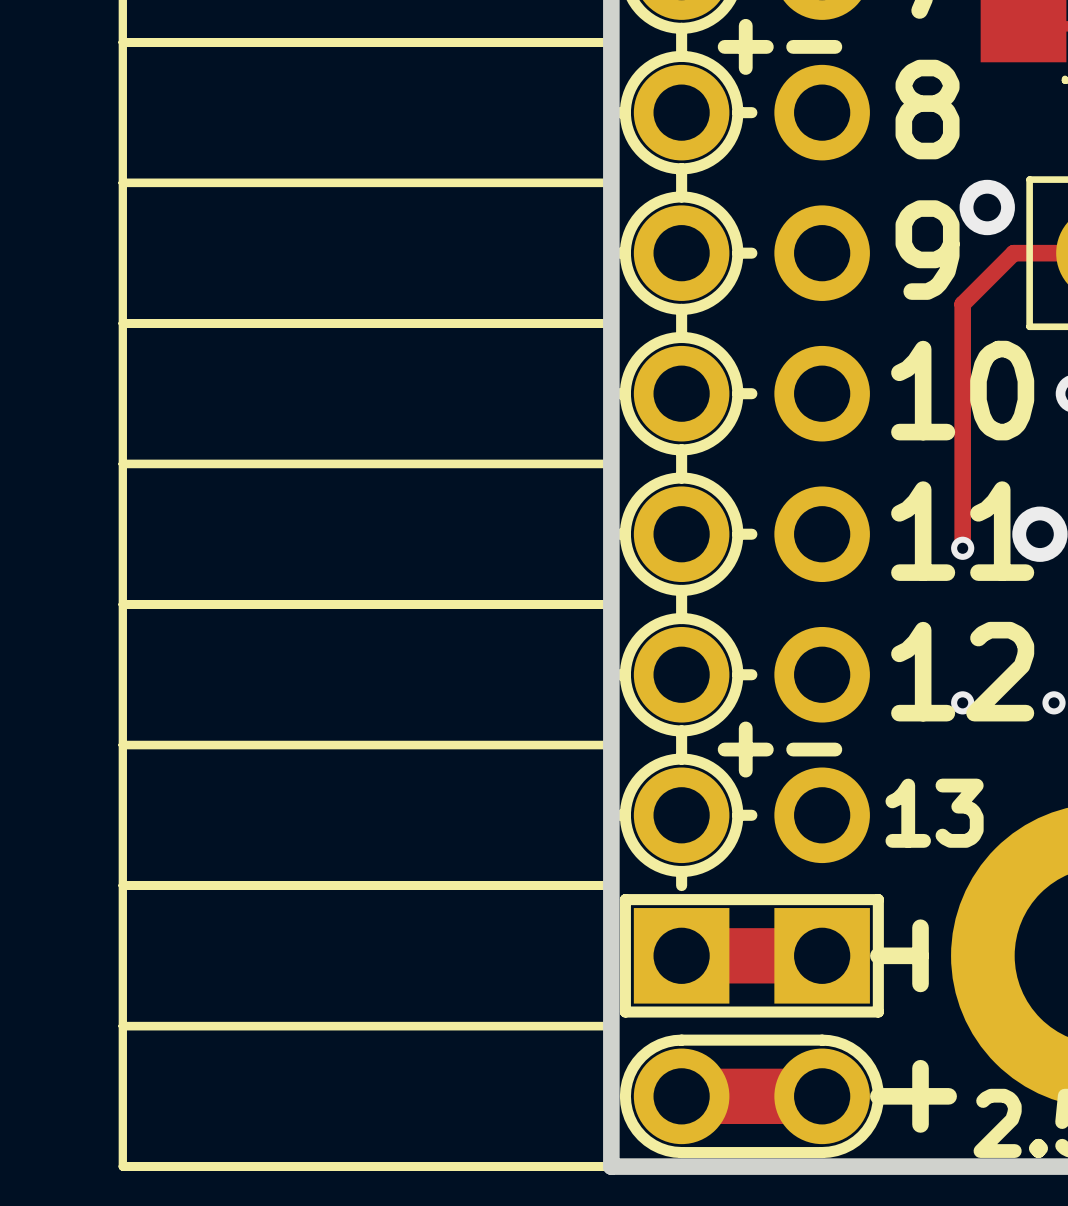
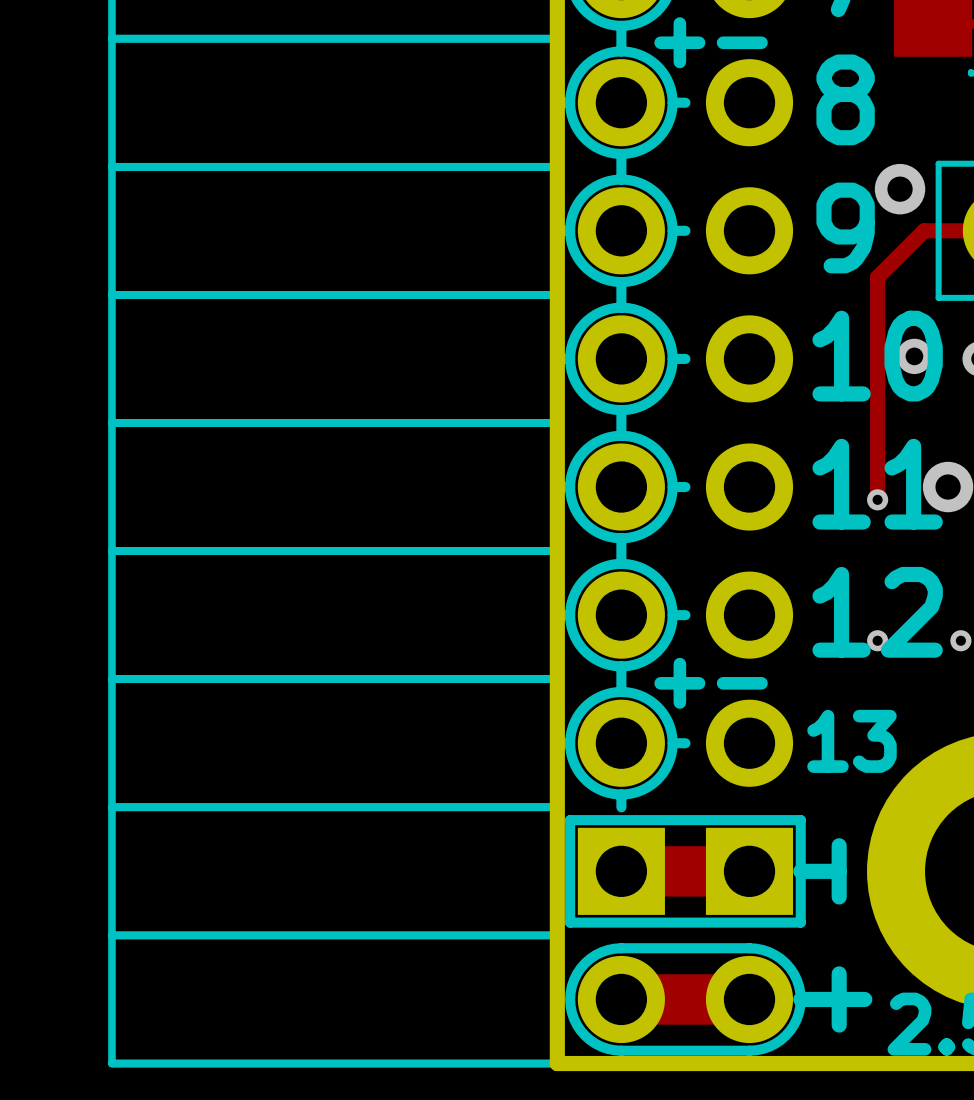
via: none -> (914, 356)

